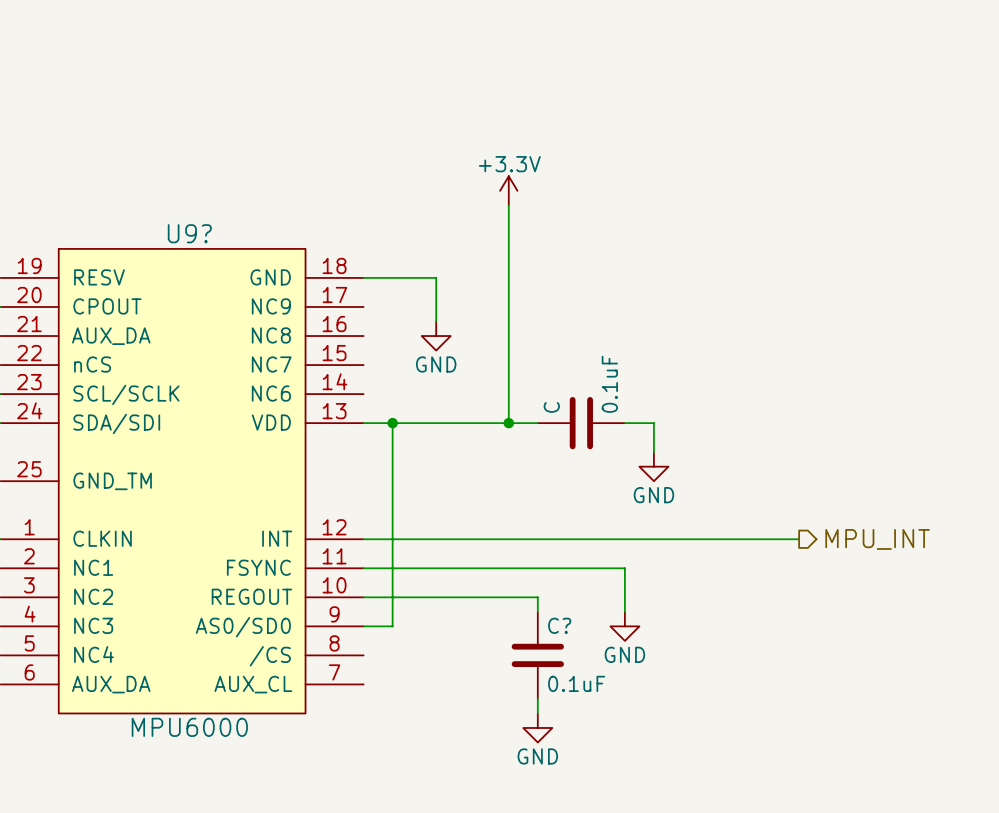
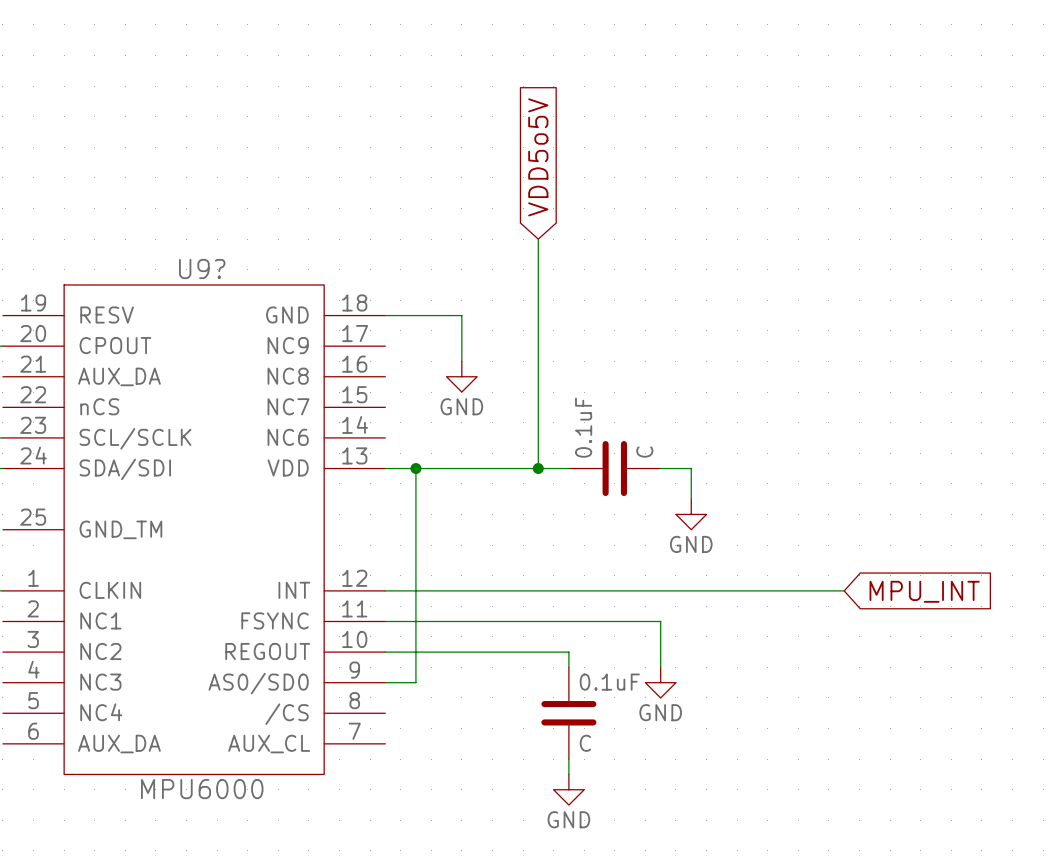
global label: none -> VDD5o5V (538, 157)
power symbol: +3.3V (508, 190) -> none
C value: 0.1uF (609, 384) -> C (644, 452)
C name: C (551, 407) -> 0.1uF (583, 427)
hierarchical label: MPU_INT (877, 539) -> none
global label: none -> MPU_INT (924, 591)
C? name: C? (559, 625) -> 0.1uF (609, 682)
C? value: 0.1uF (576, 683) -> C (585, 743)

